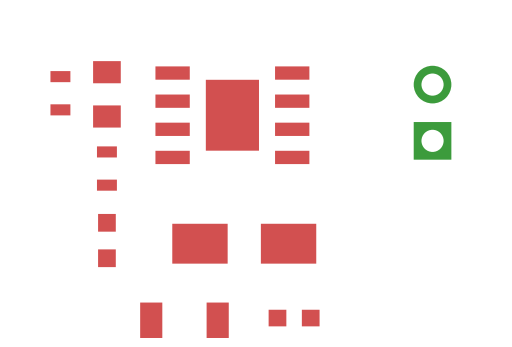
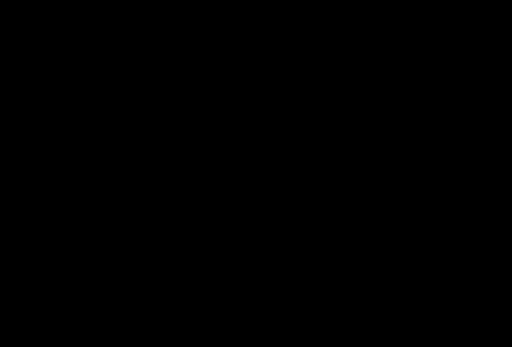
part: (60, 93) -> none
part: (106, 94) -> none
part: (432, 112) -> none
part: (232, 115) -> none
part: (106, 168) -> none
part: (106, 240) -> none
part: (244, 243) -> none
part: (294, 318) -> none
part: (184, 320) -> none

